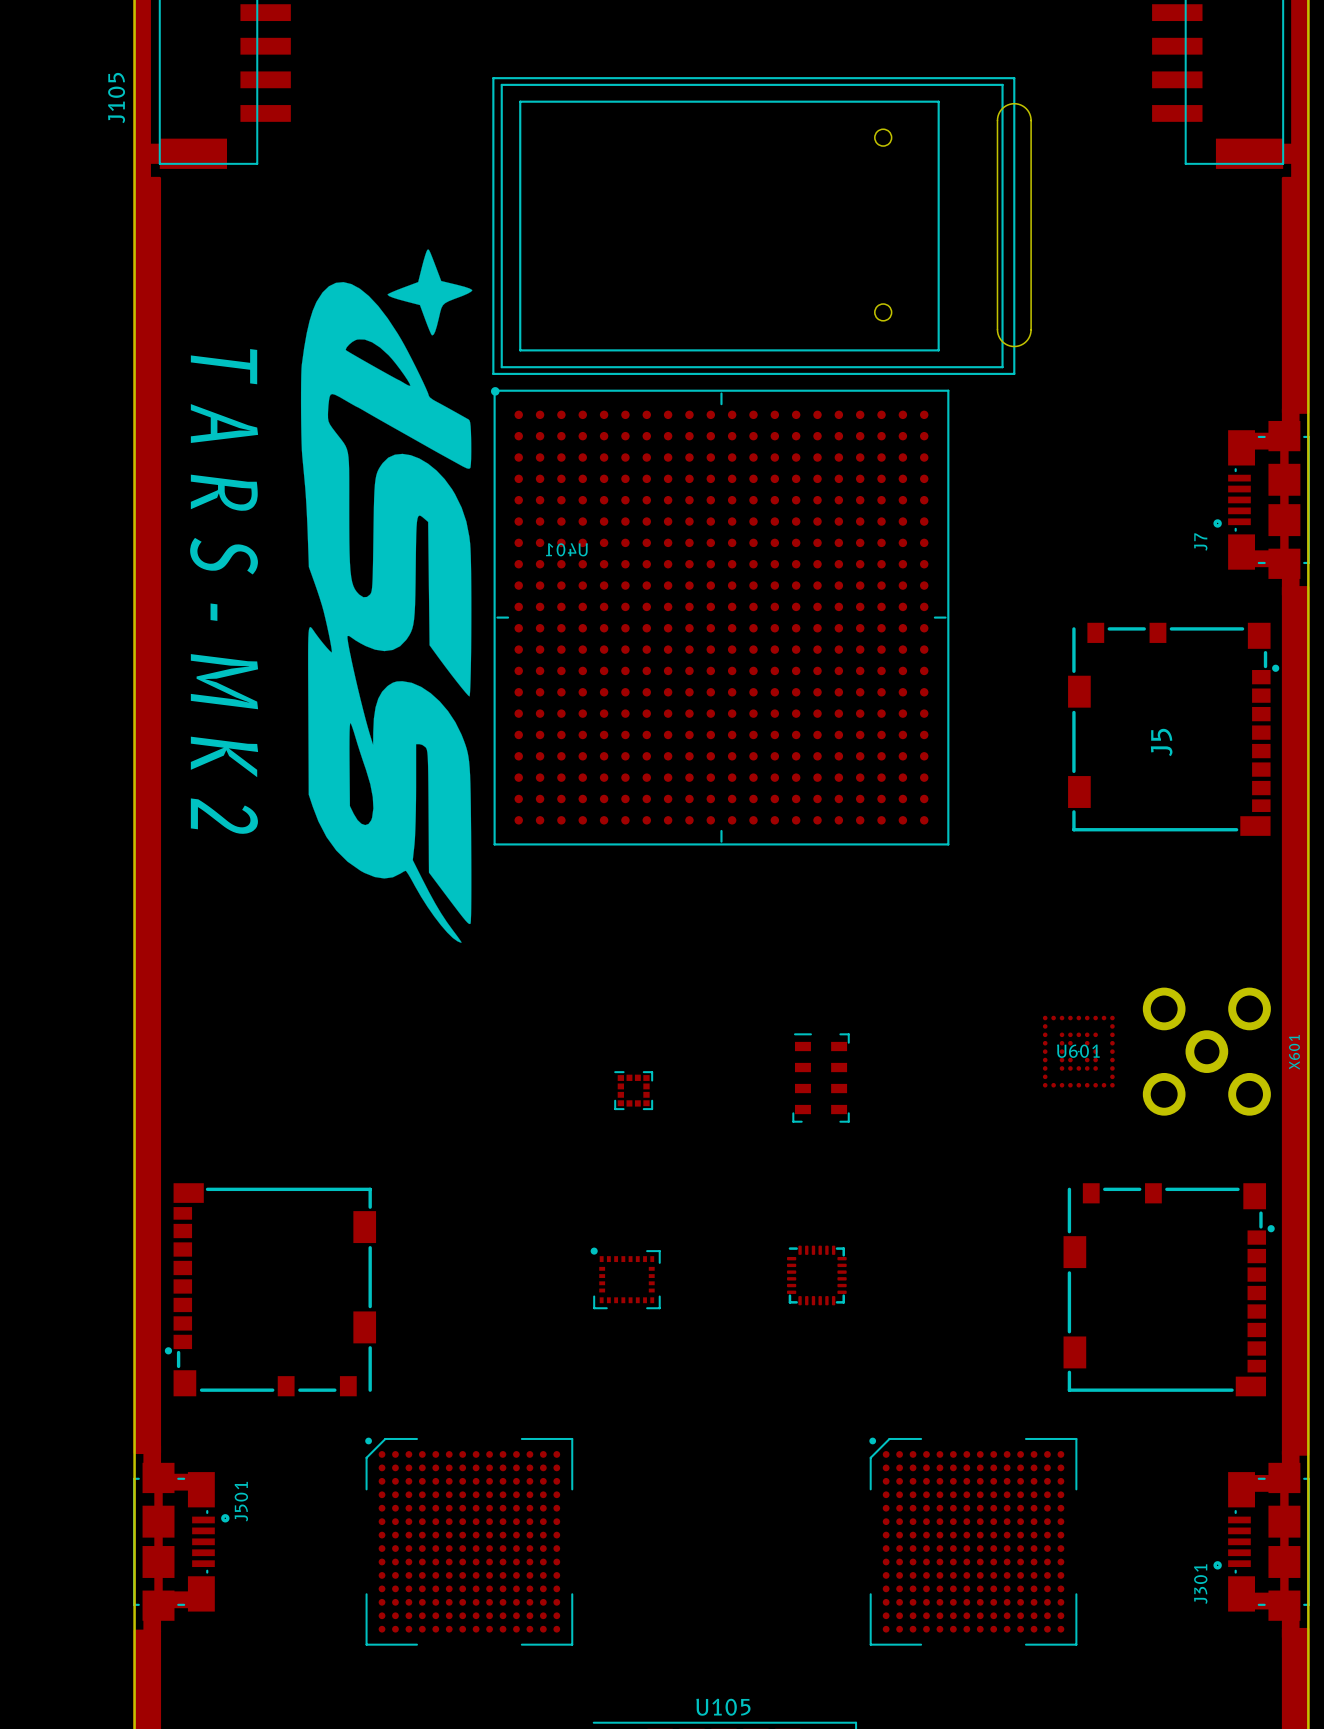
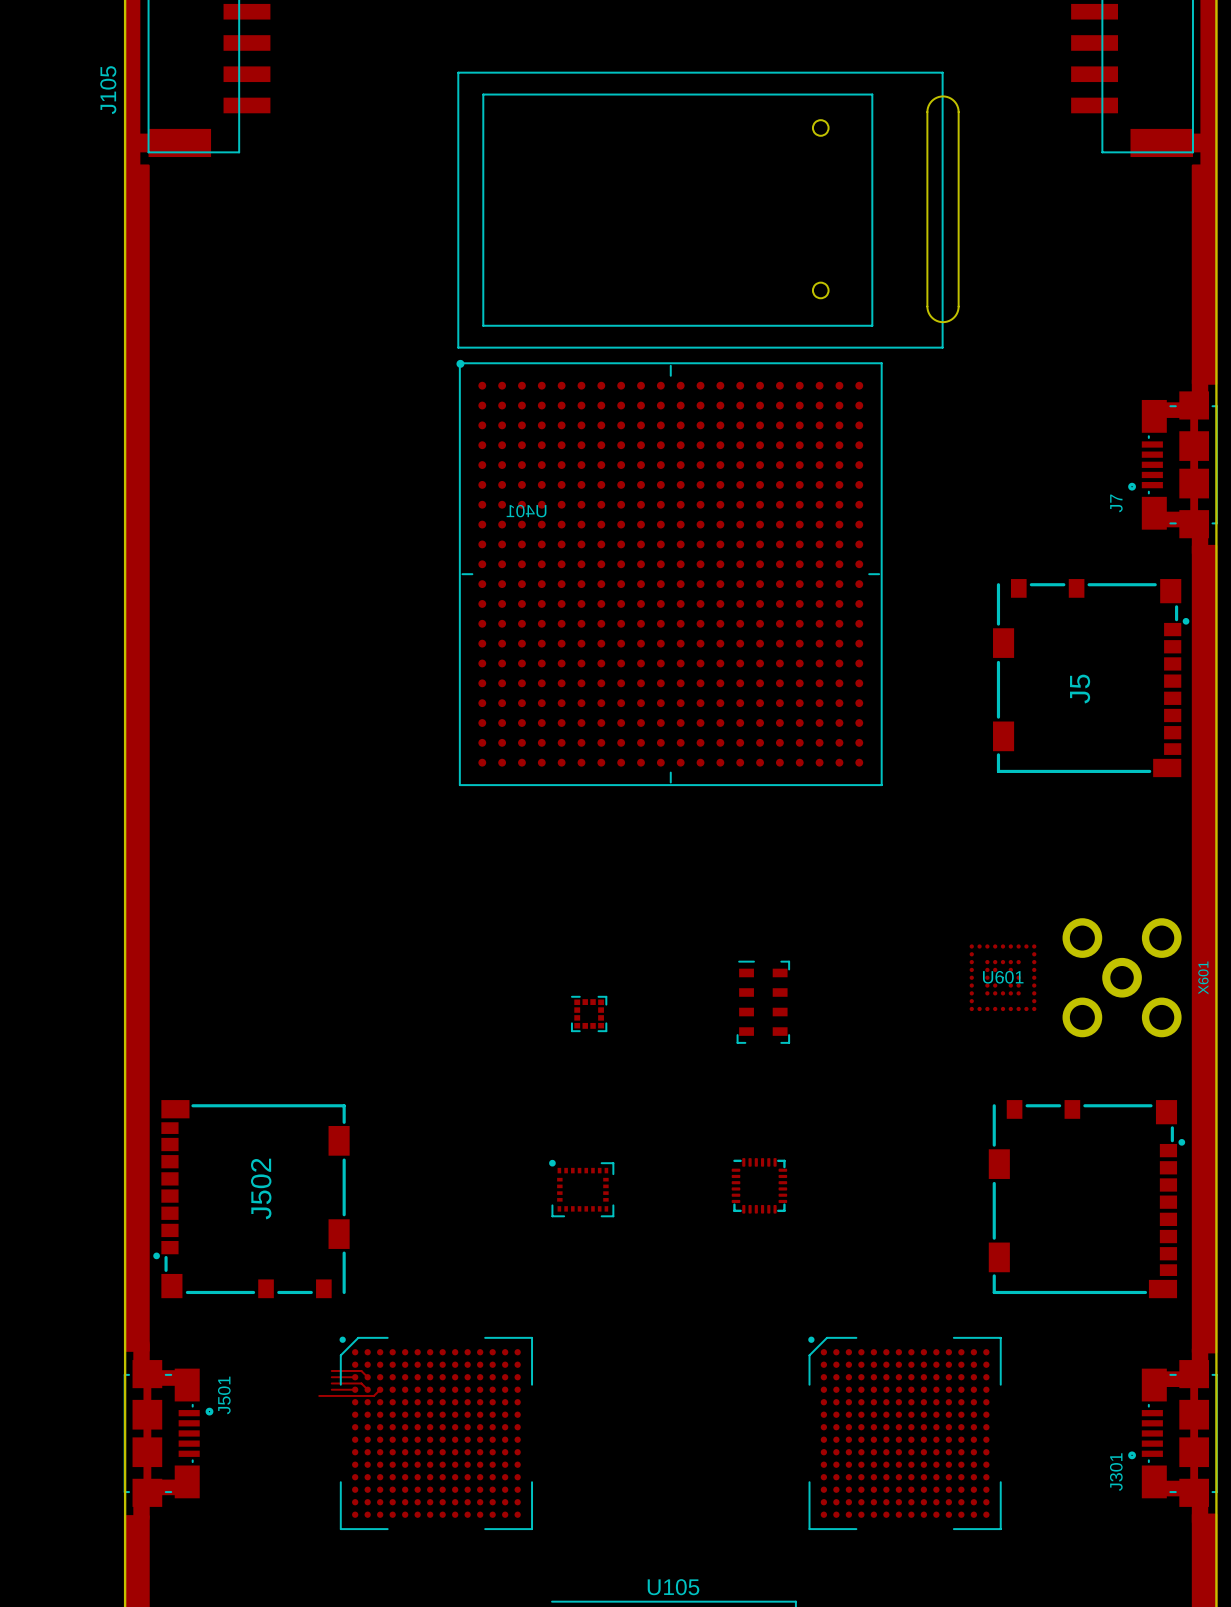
part footprint: [492, 77, 1016, 375] -> [457, 71, 944, 349]
drawing: [300, 249, 473, 943] -> none
text: T A R S - M K 2 (224, 591) -> none
J502 name: none -> J502 (261, 1189)
track: none -> (331, 1370) (361, 1370) (367, 1377)
track: none -> (331, 1377) (355, 1377)
track: none -> (331, 1383) (361, 1383) (367, 1389)
track: none -> (331, 1389) (355, 1389)
track: none -> (380, 1389) (373, 1395) (319, 1395)

